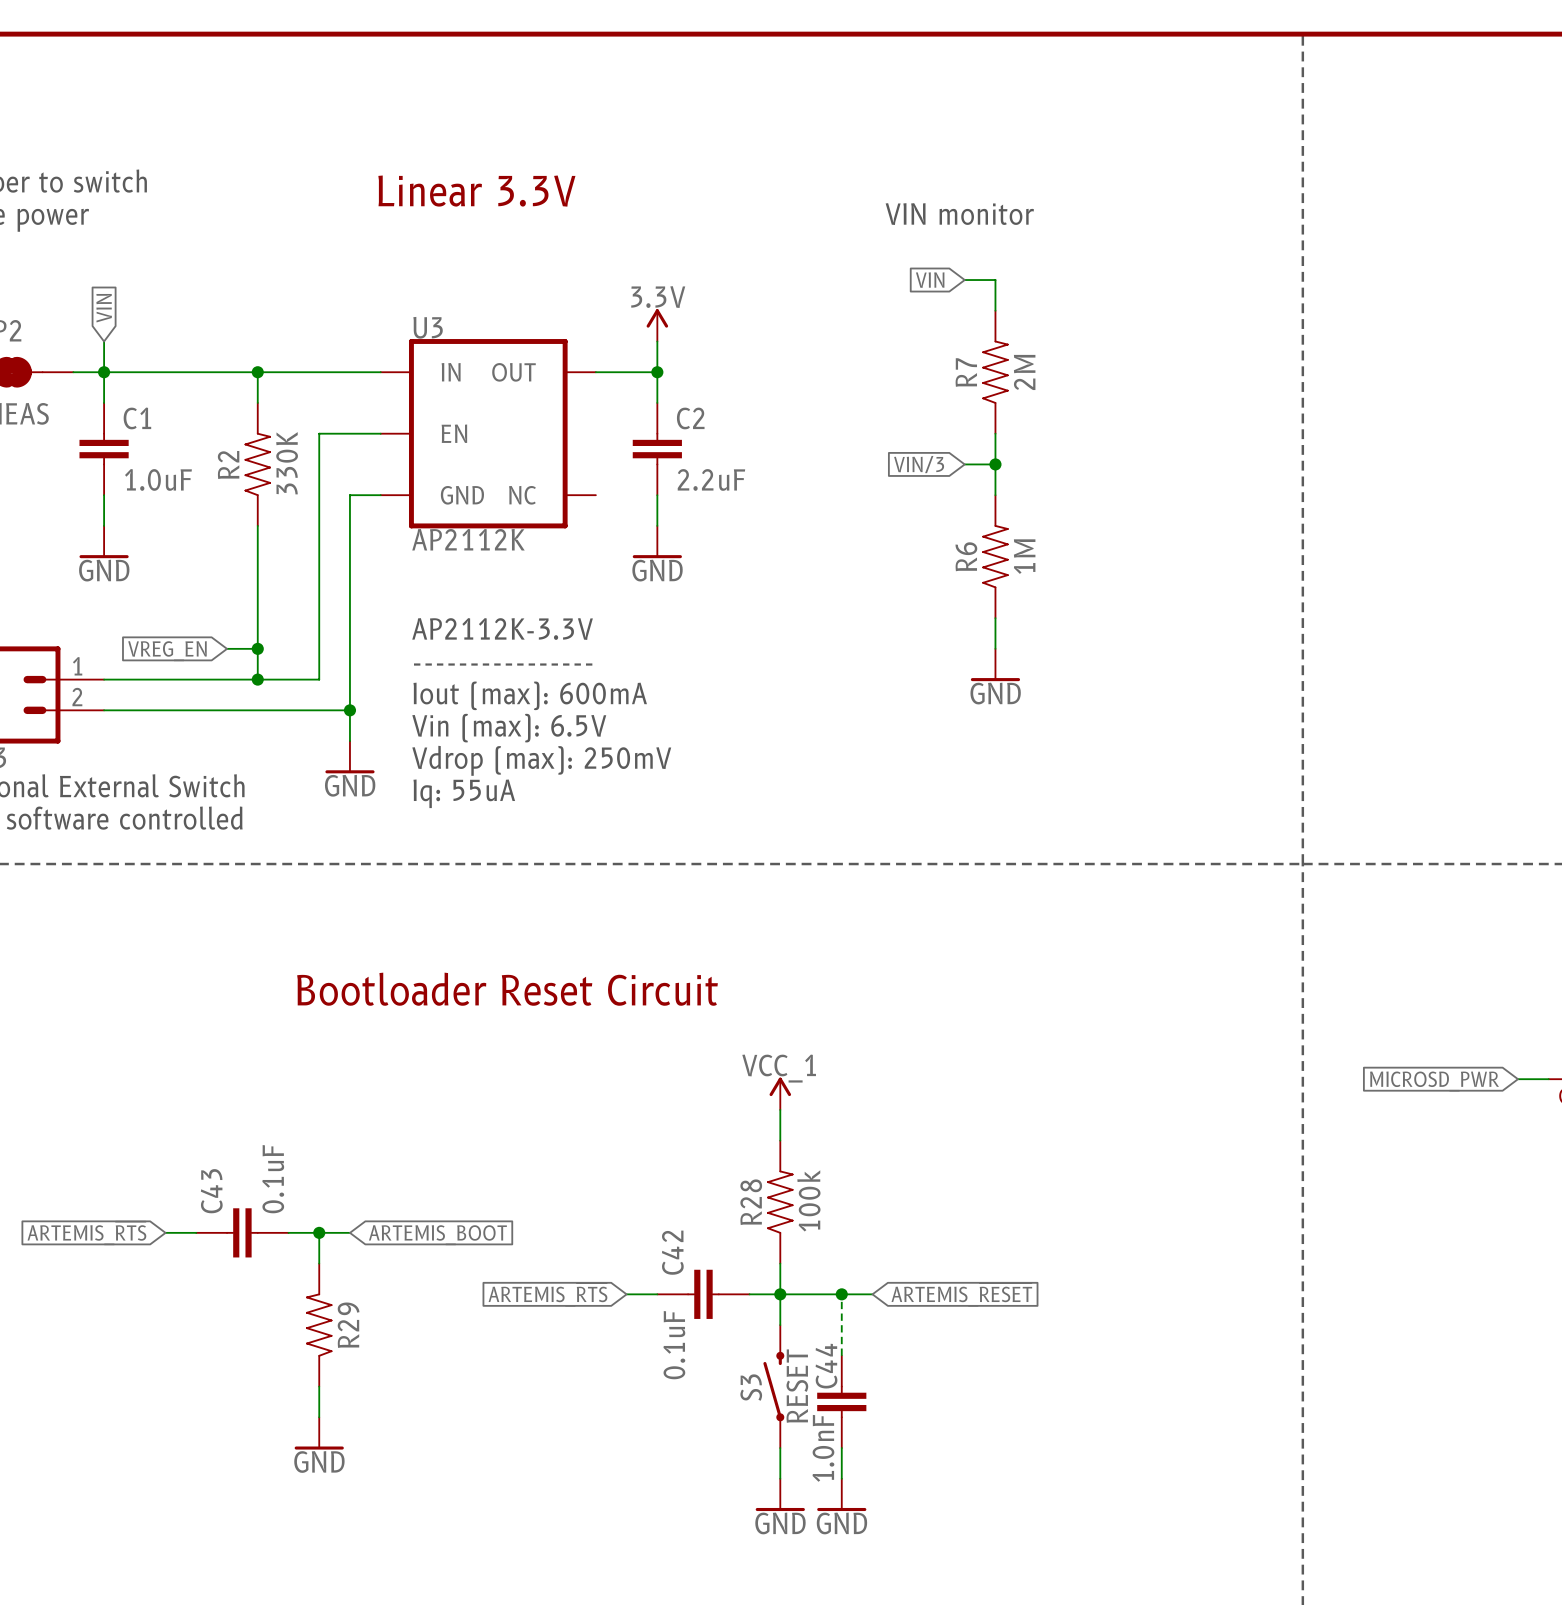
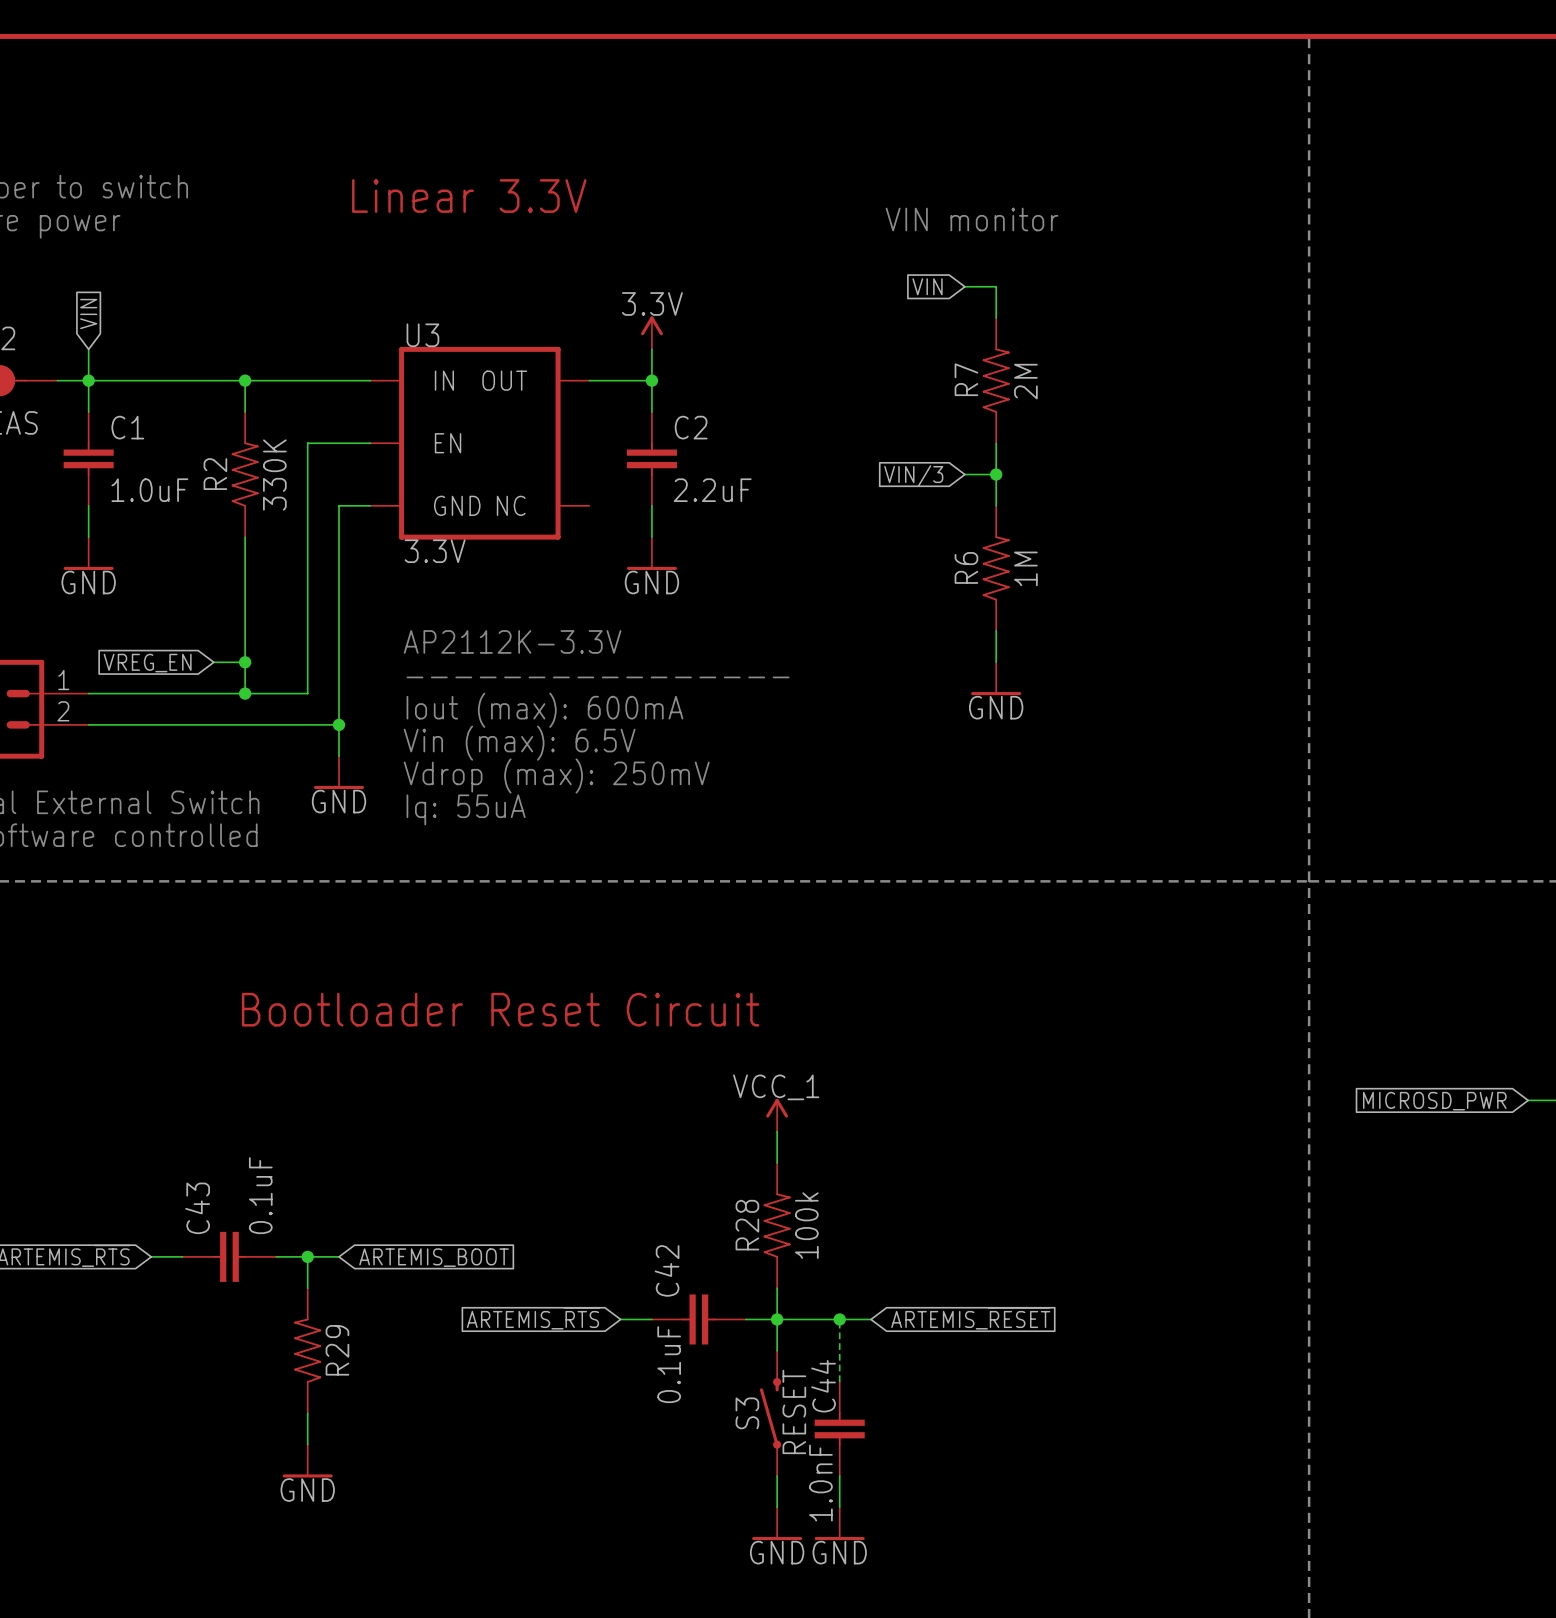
U3 value: AP2112K (468, 539) -> 3.3V (435, 551)

